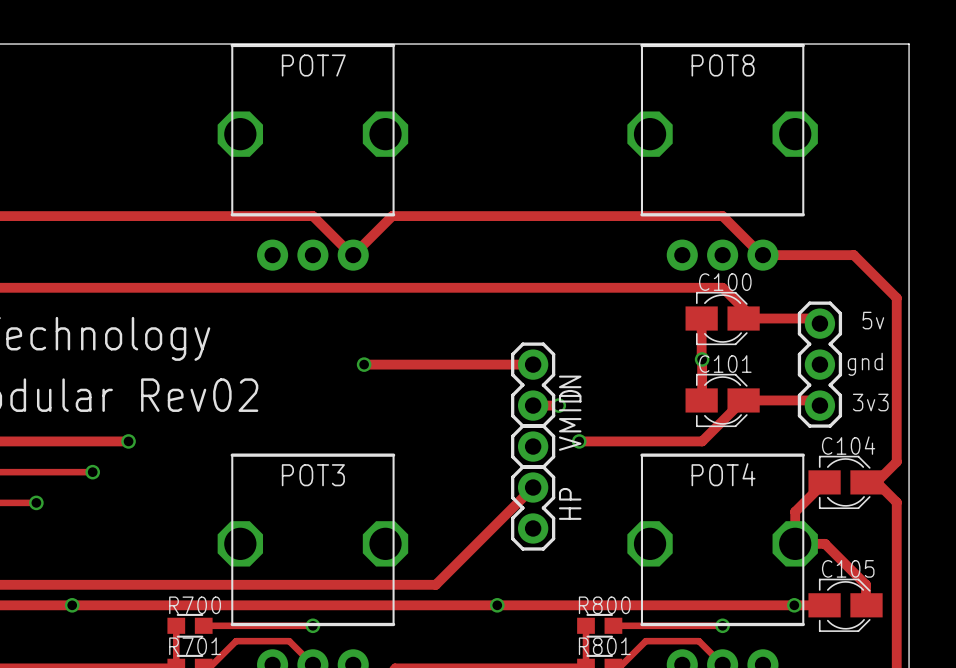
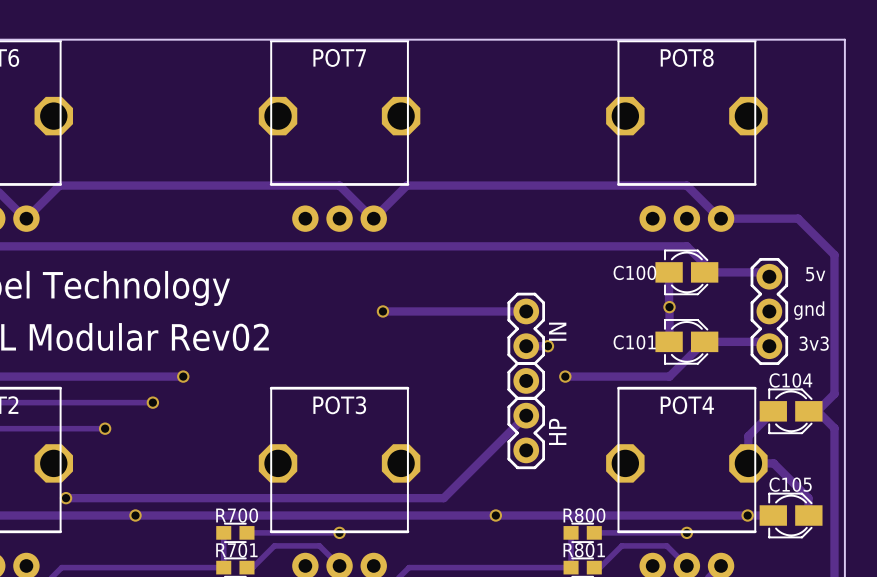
C100 name position: C100 (725, 282) -> C100 (634, 272)
C101 name position: C101 (725, 364) -> C101 (634, 342)
VMID name: VMID (570, 420) -> none

